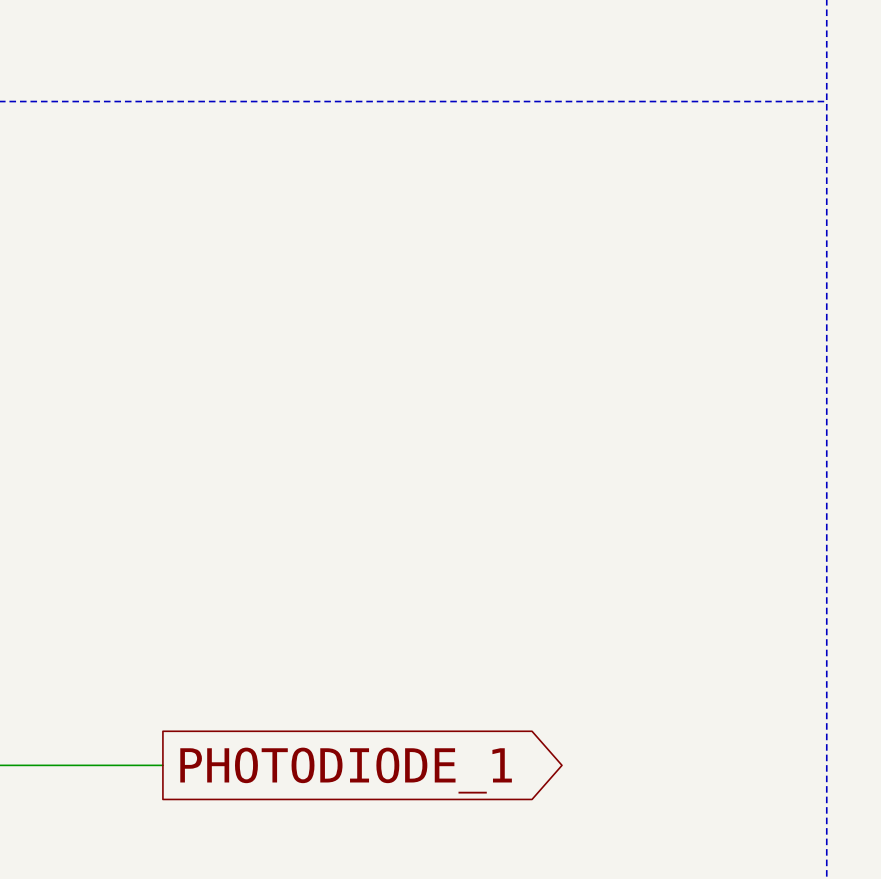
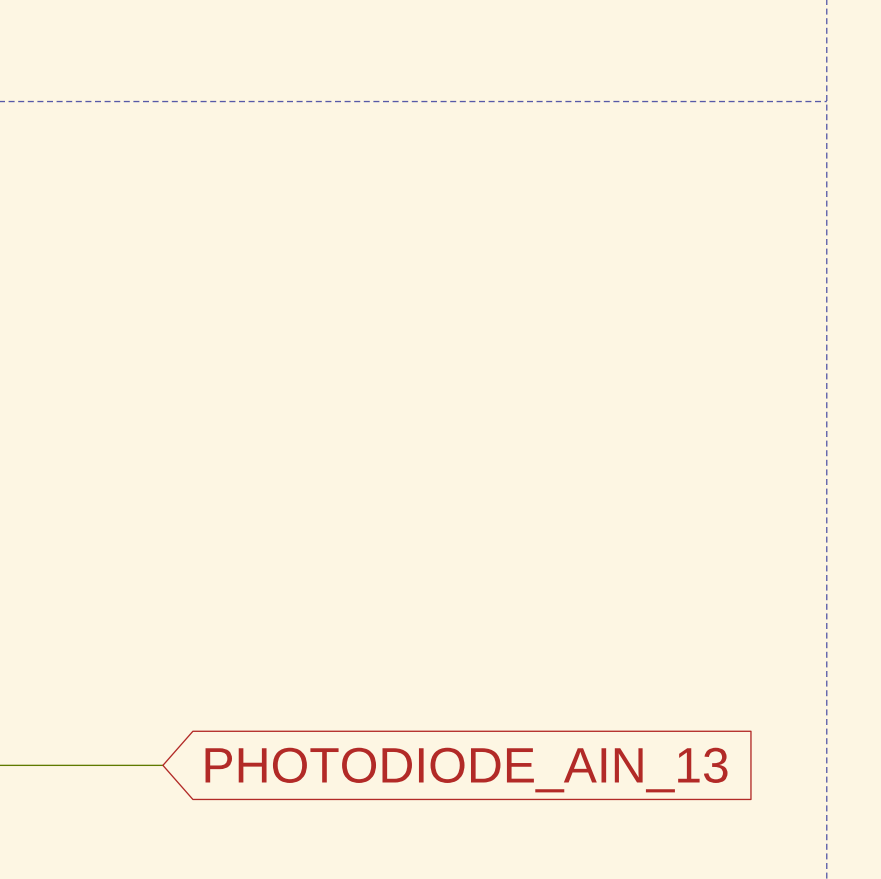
global label shape: output (346, 770) -> input (466, 770)
global label: PHOTODIODE_1 (346, 770) -> PHOTODIODE_AIN_13 (466, 770)

